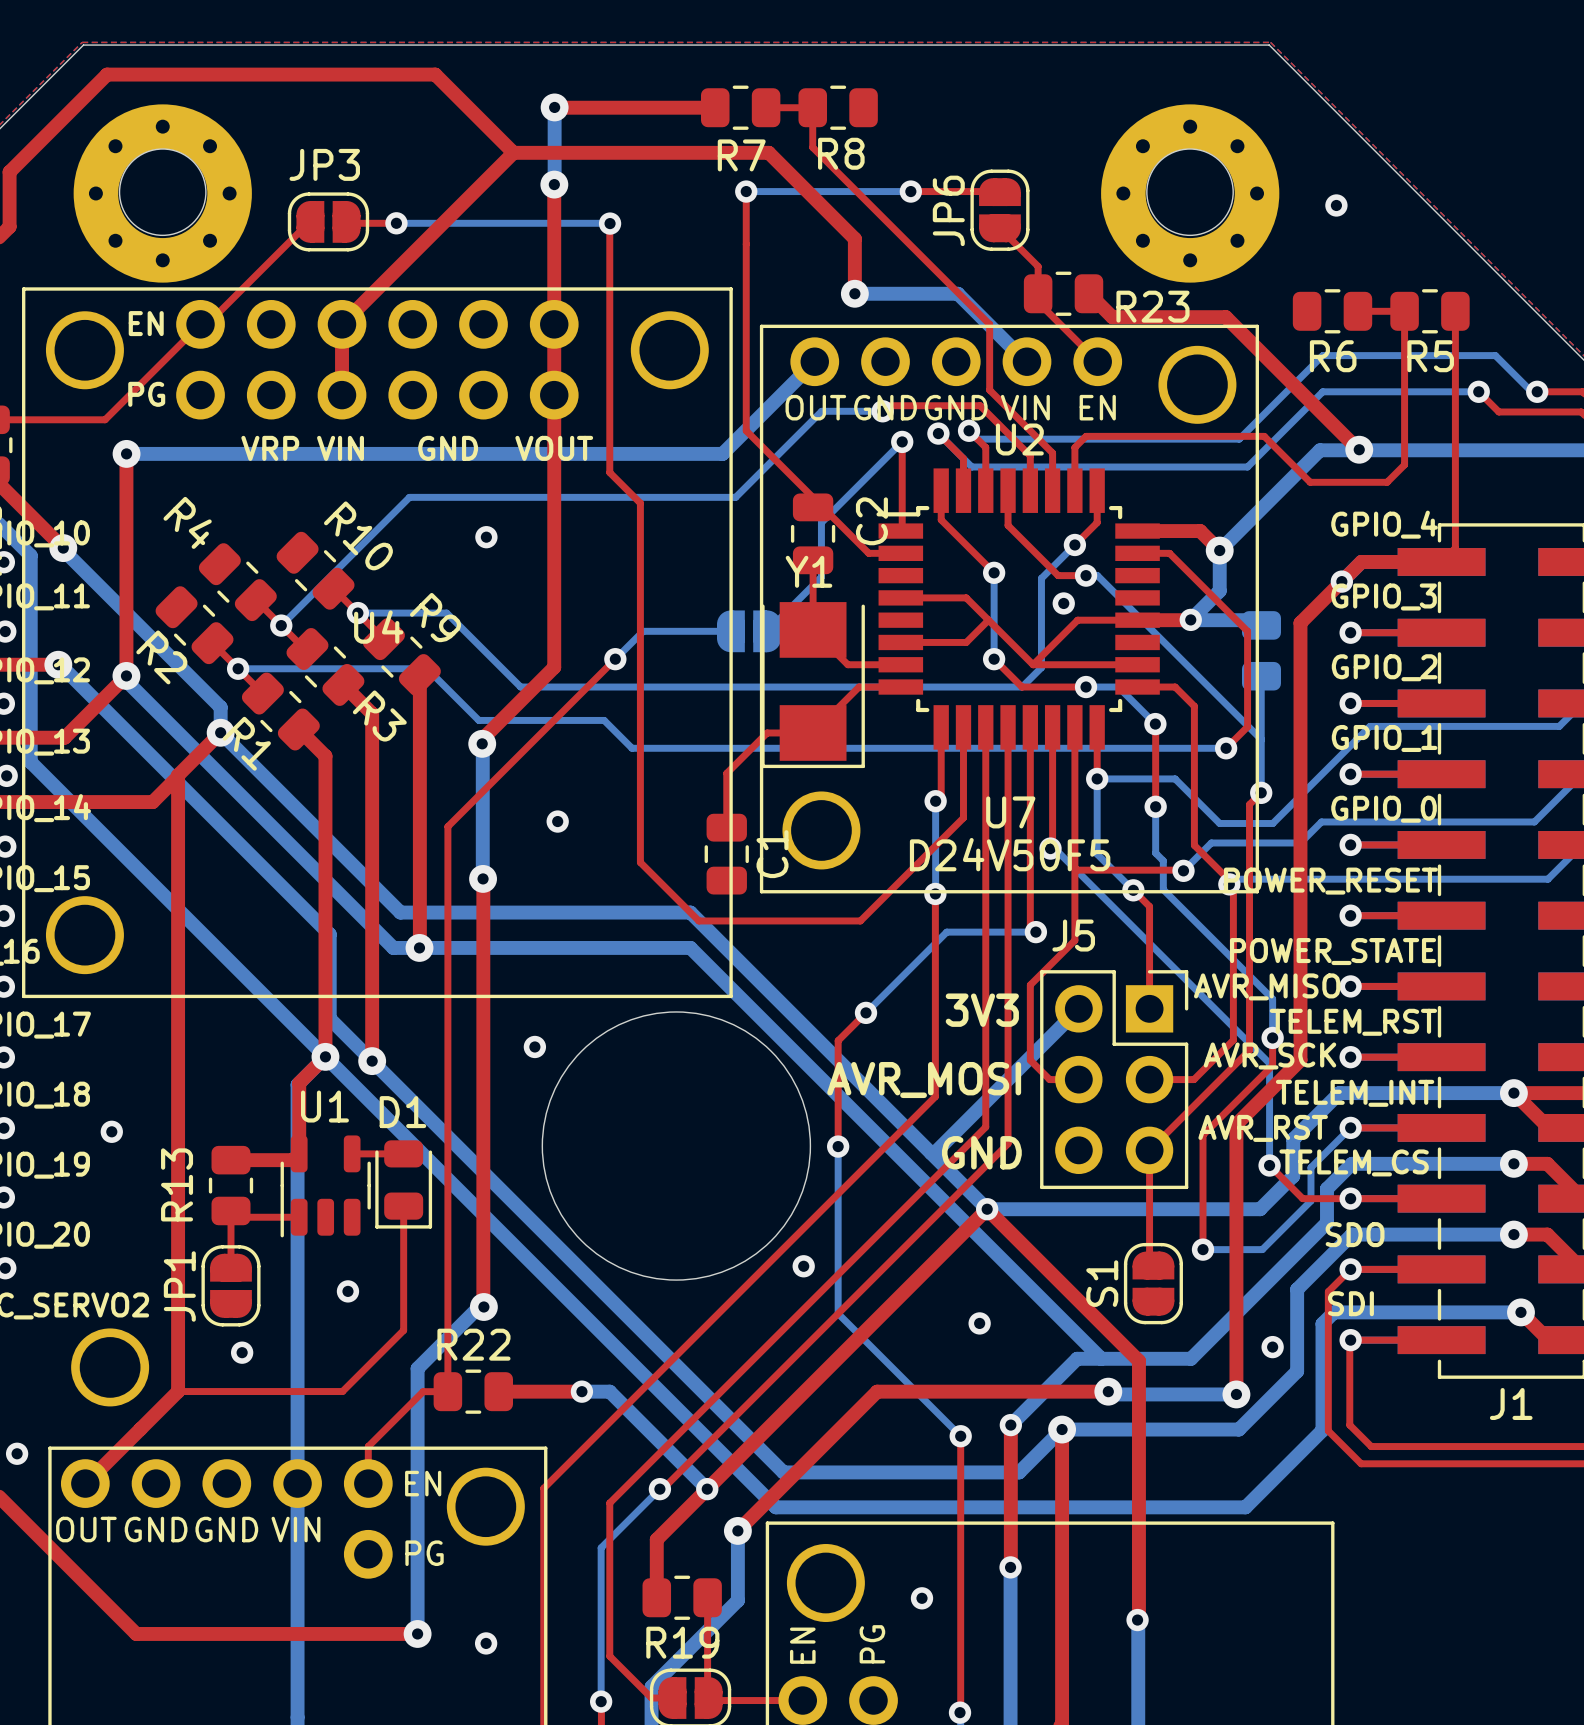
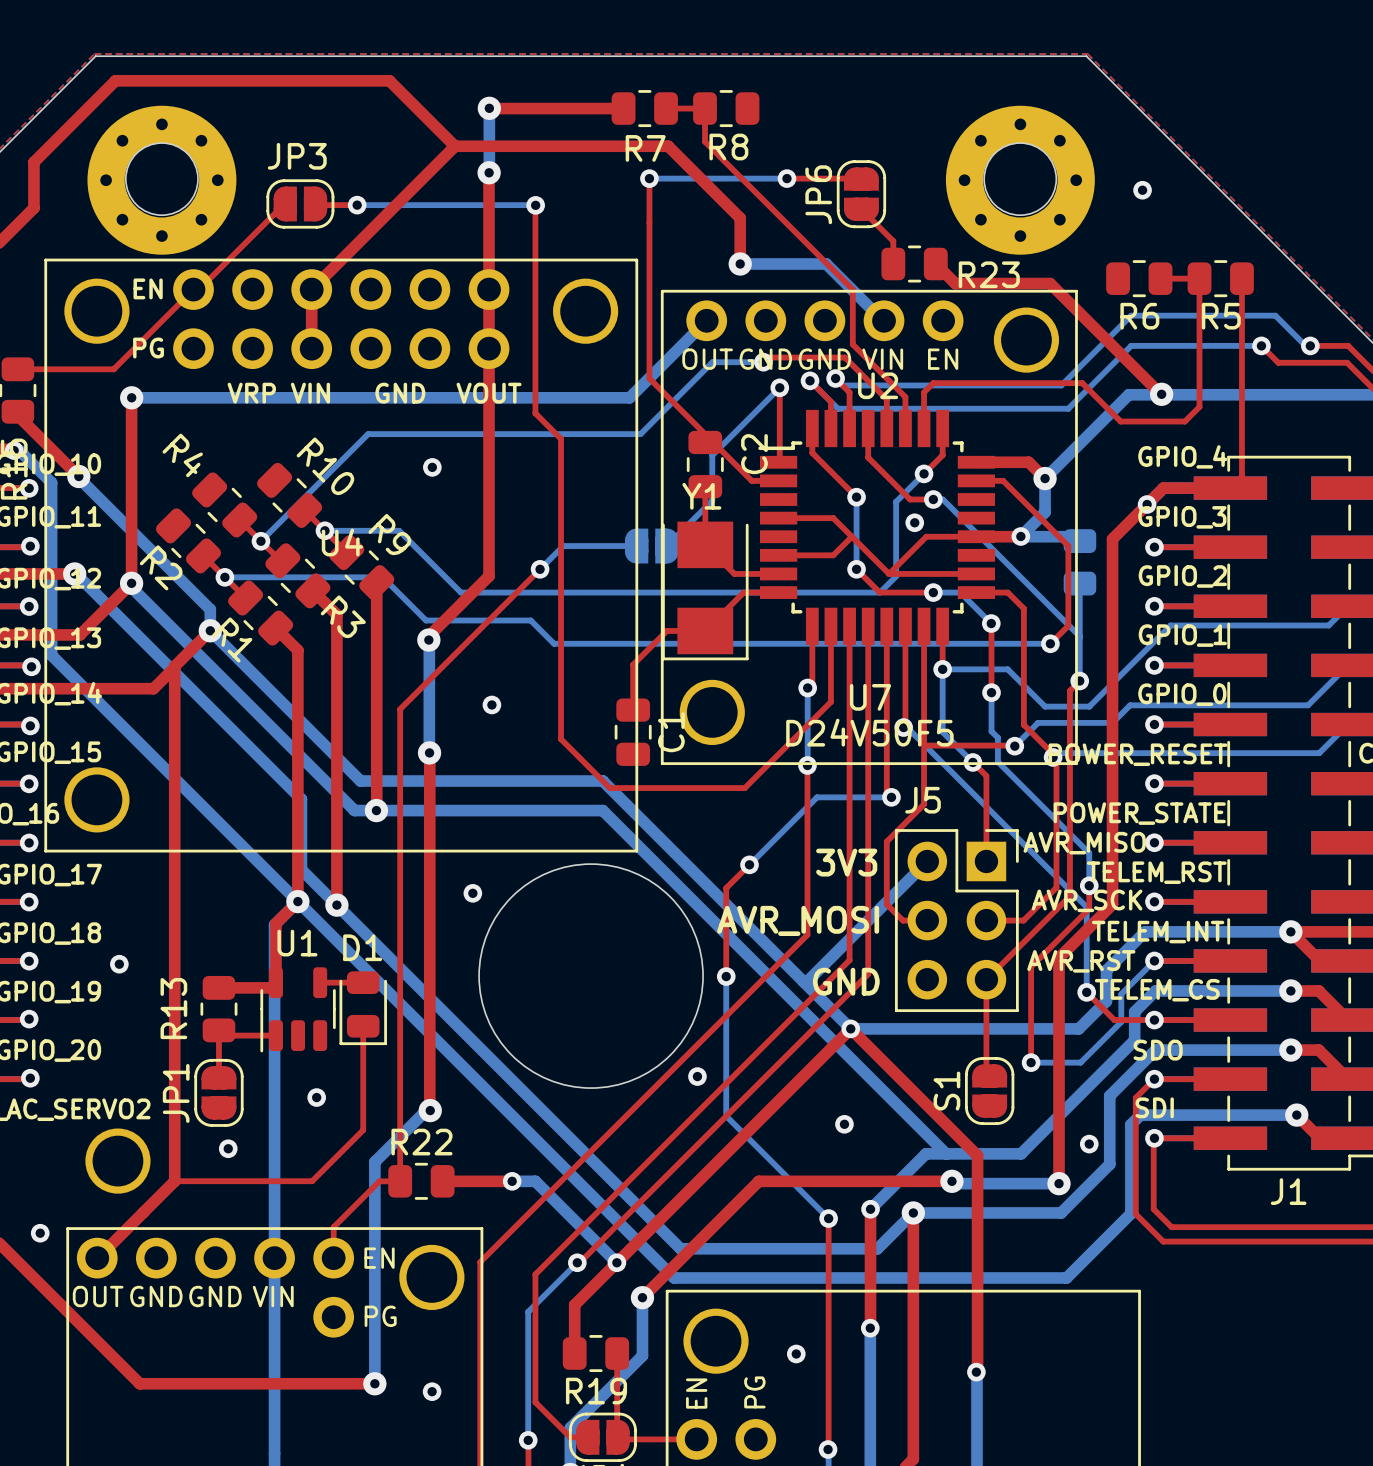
top track: (1038, 293) (1038, 302) (1097, 361) -> none

